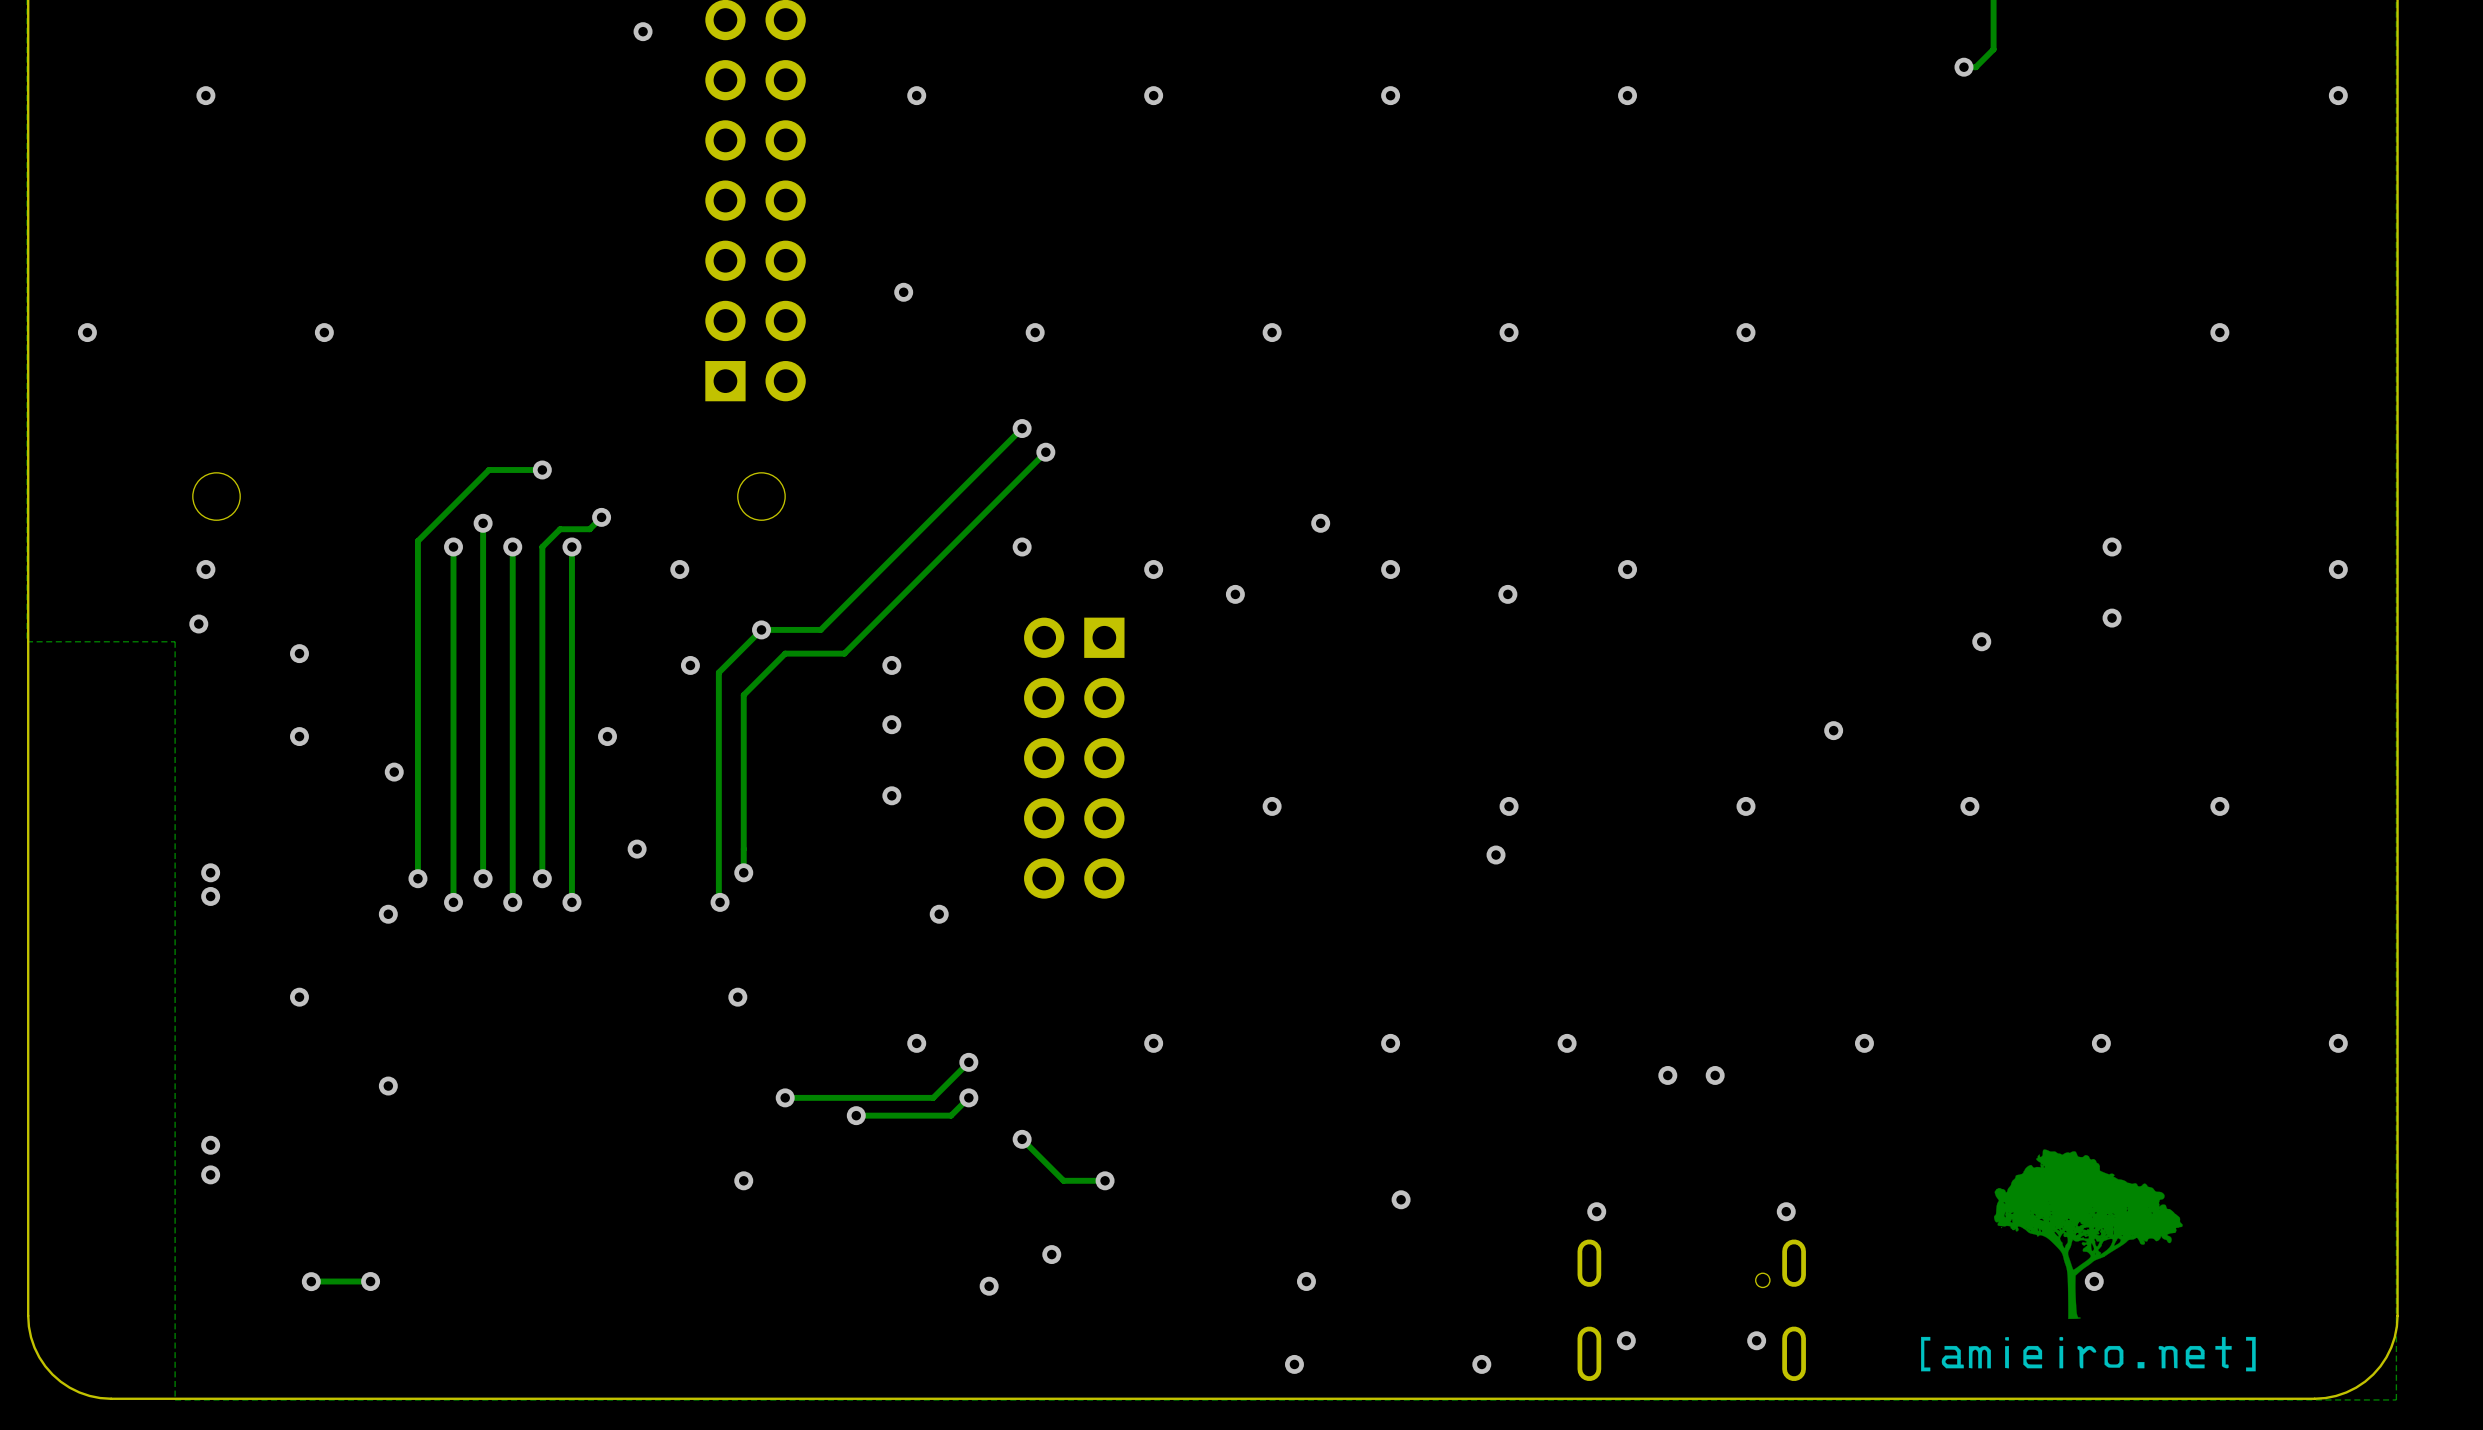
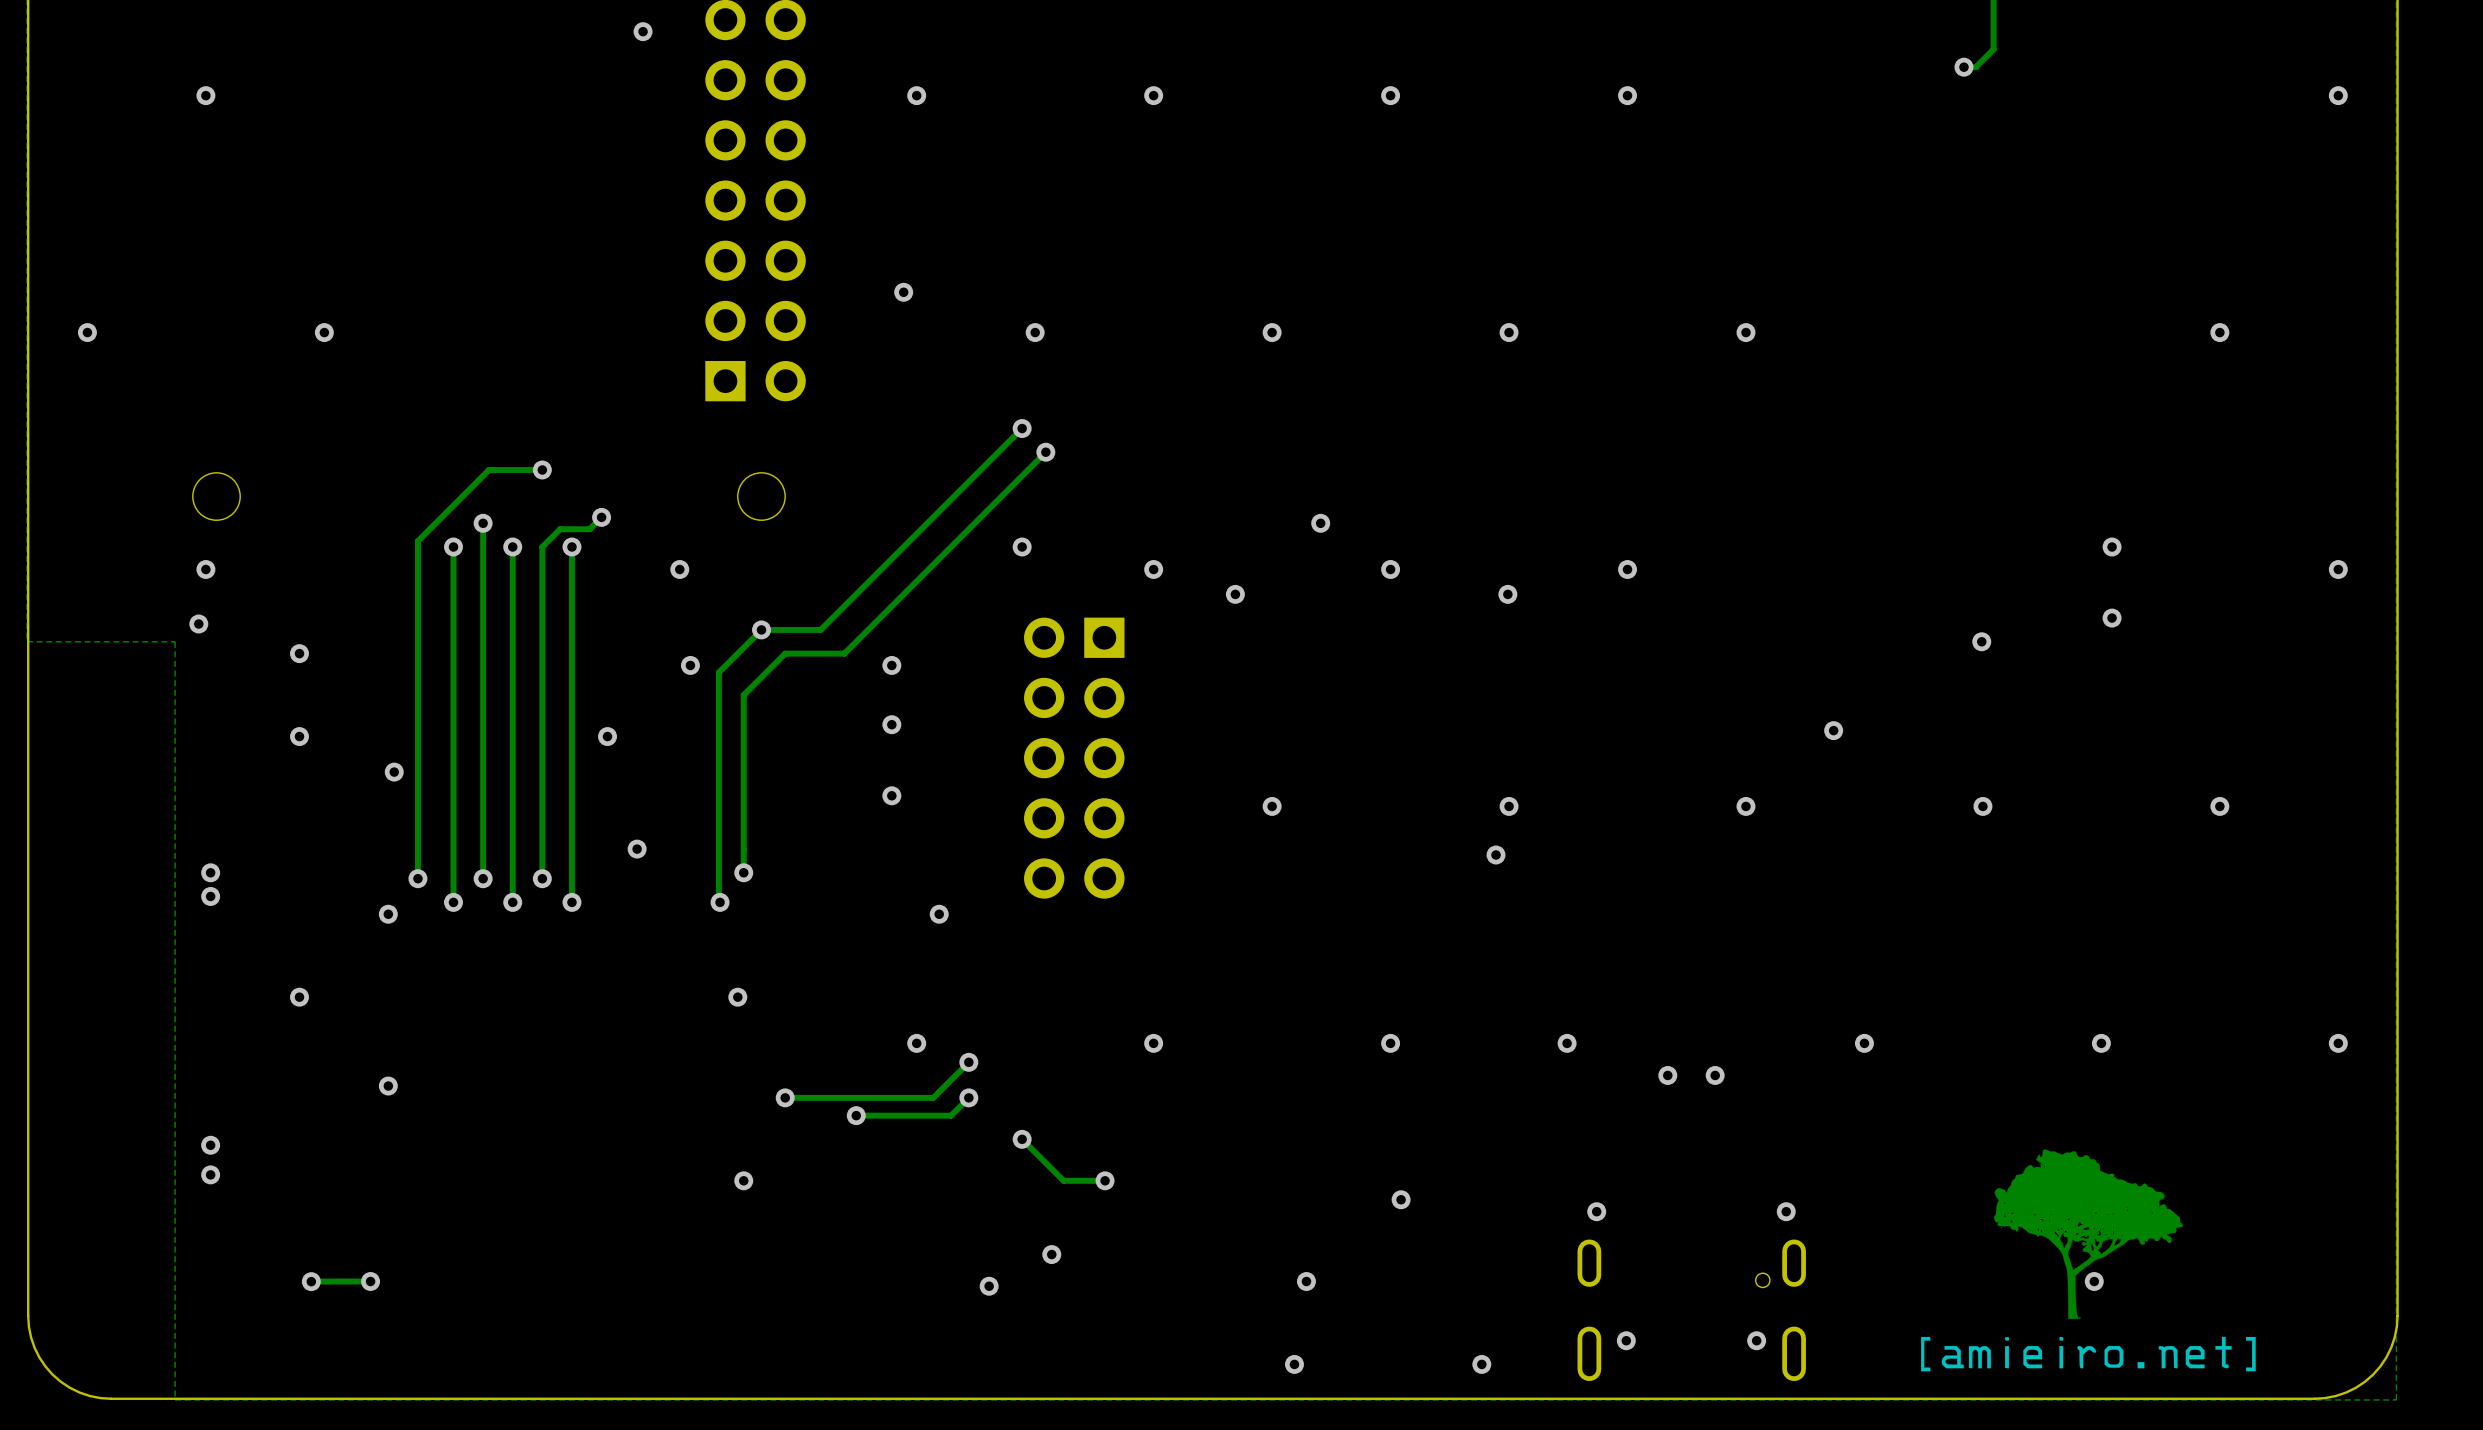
via position: (1969, 806) -> (1982, 806)

